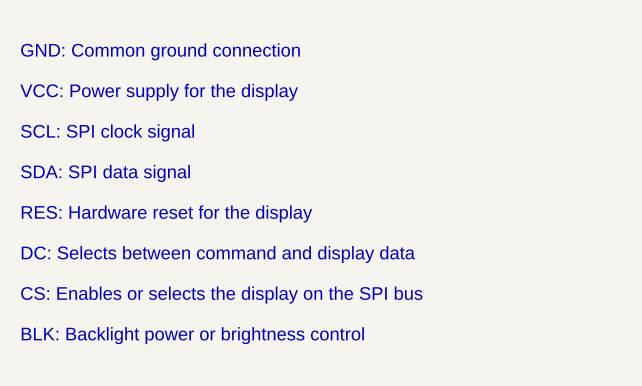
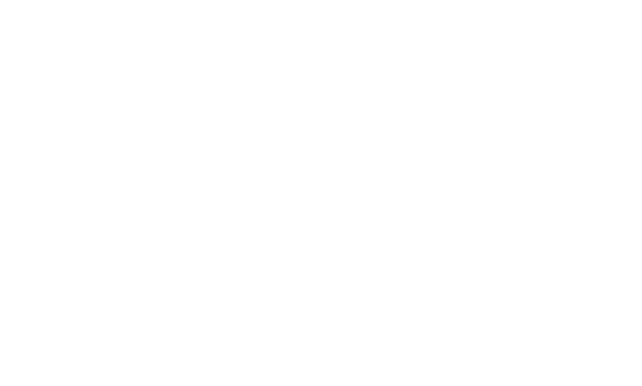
text: GND: Common ground connection (160, 51) -> none
text: VCC: Power supply for the display (159, 92) -> none
text: SCL: SPI clock signal (107, 132) -> none
text: SDA: SPI data signal (105, 173) -> none
text: RES: Hardware reset for the display (166, 213) -> none
text: DC: Selects between command and display data (218, 254) -> none
text: CS: Enables or selects the display on the SPI bus (221, 295) -> none
text: BLK: Backlight power or brightness control (192, 335) -> none

